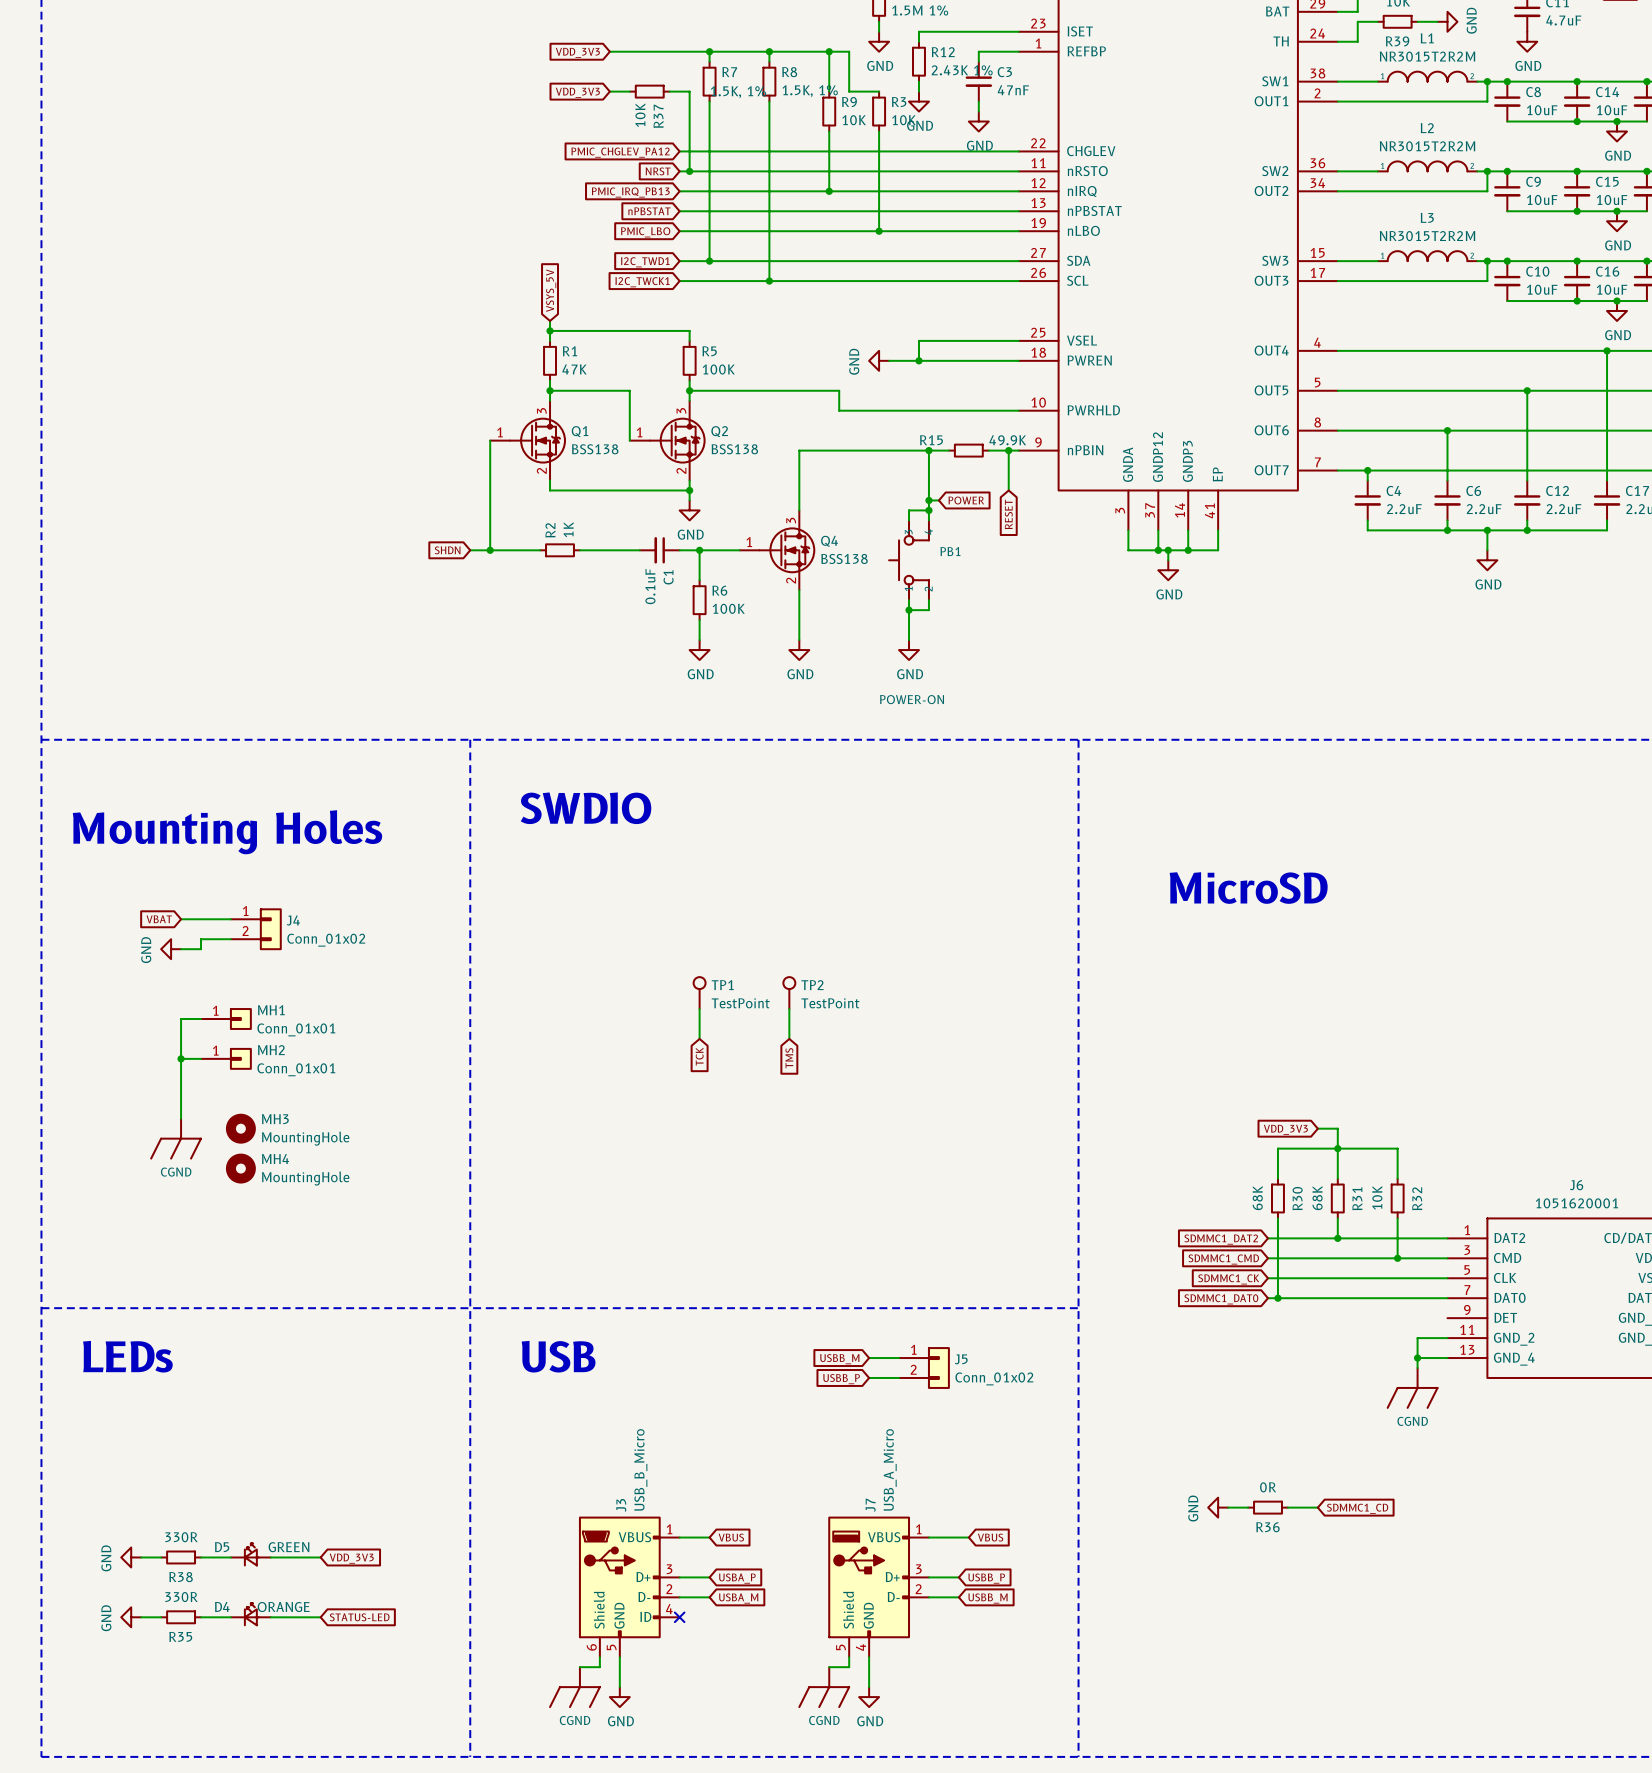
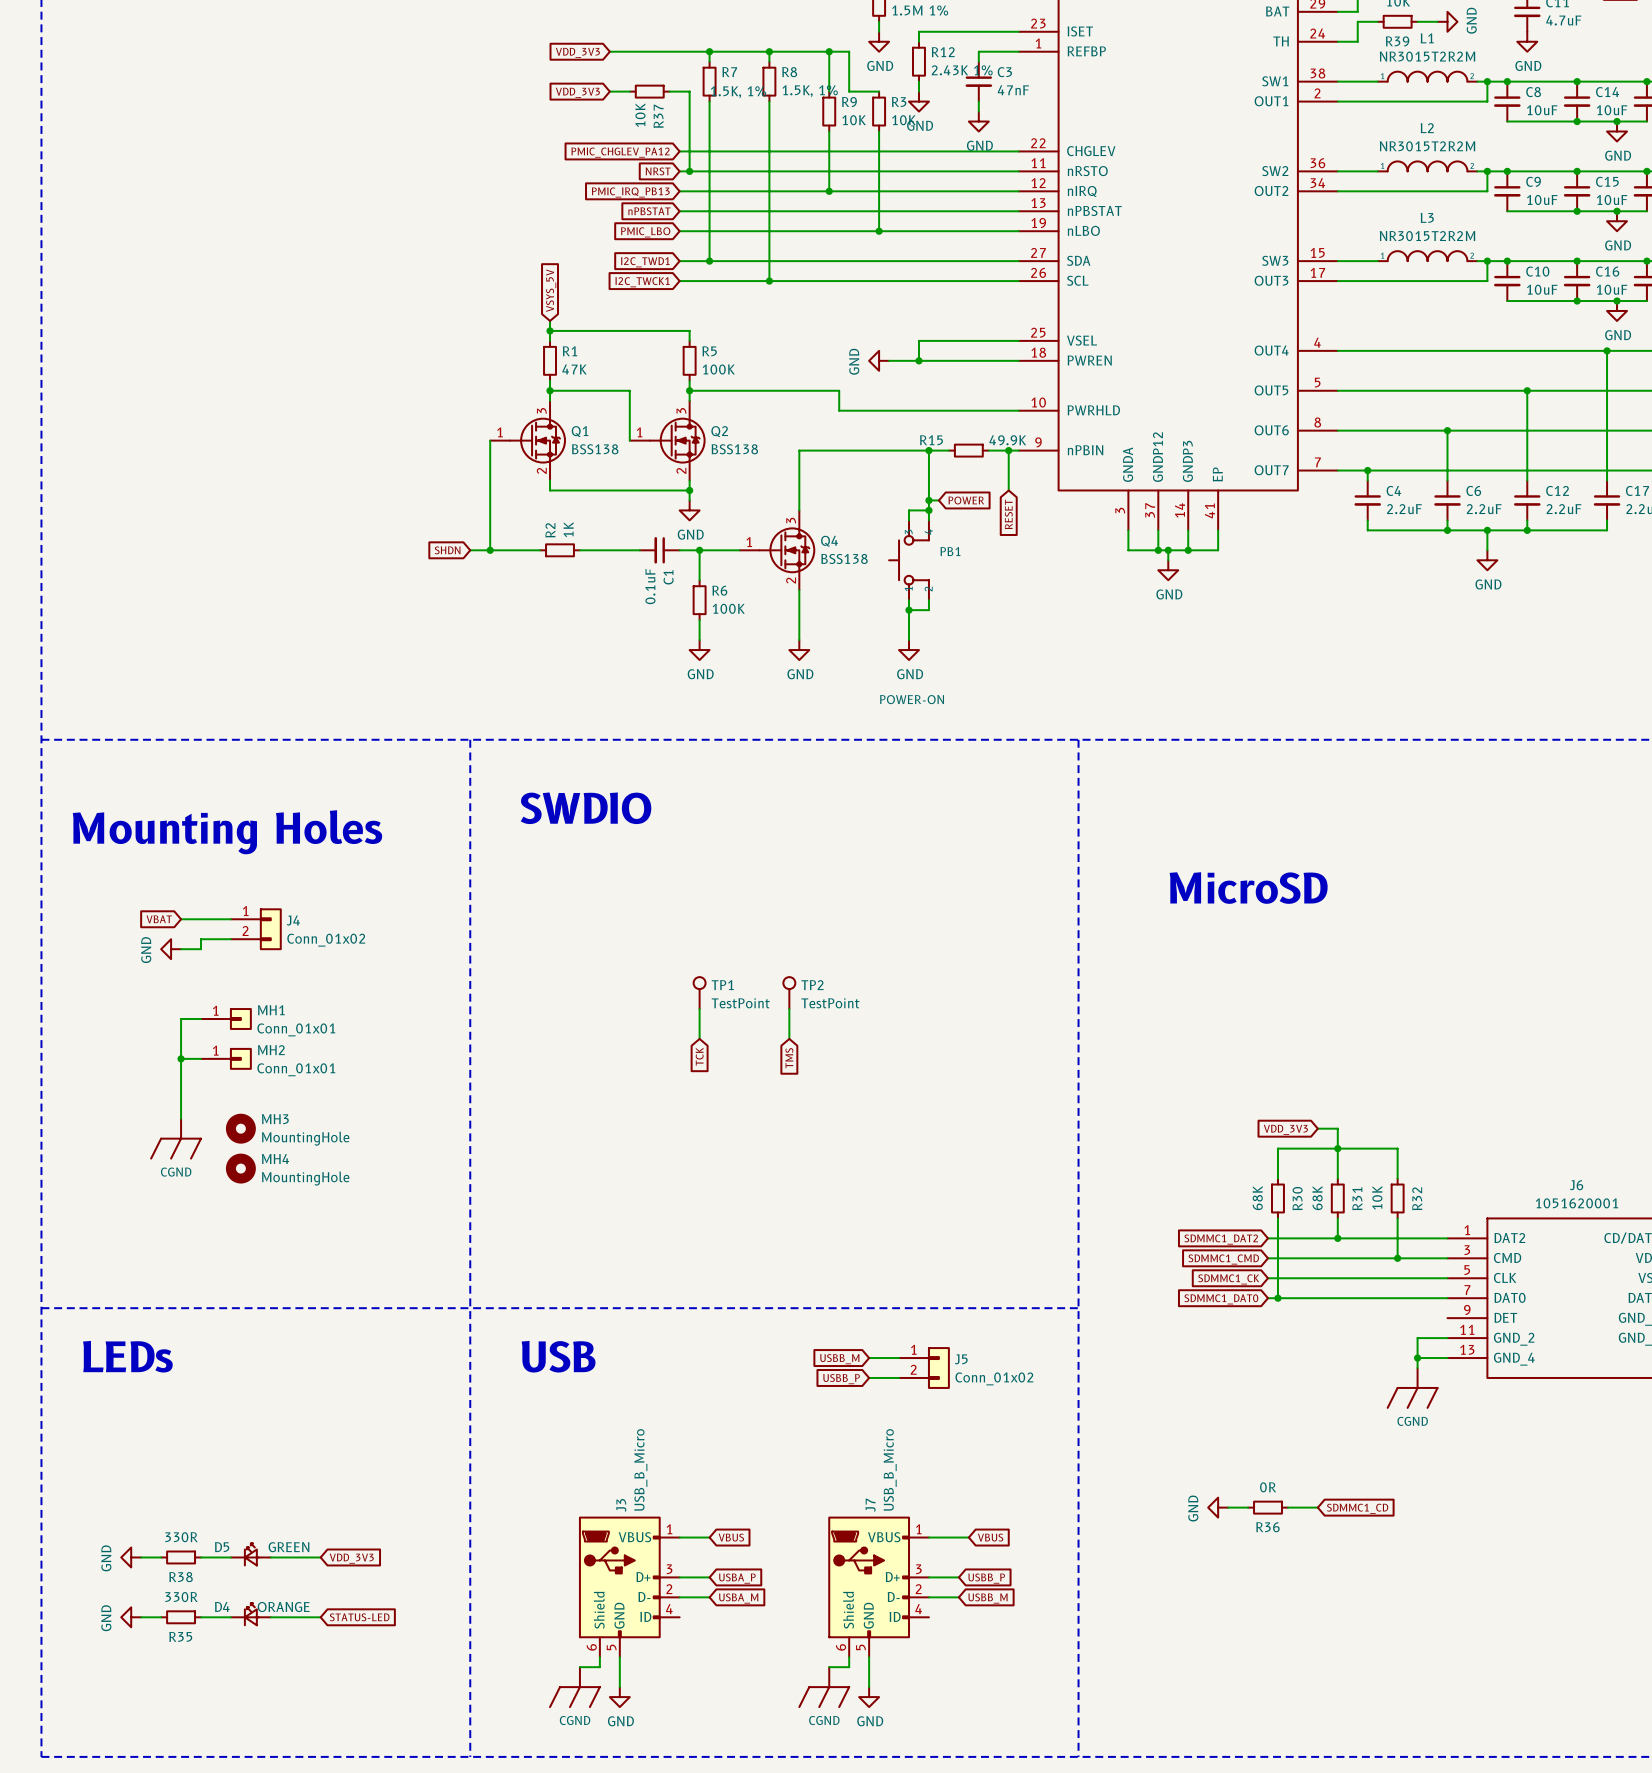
J7 value: USB_A_Micro (890, 1469) -> USB_B_Micro (890, 1469)
J7 symbol: [828, 1516, 929, 1658] -> [828, 1516, 929, 1658]
no-connect mark: (679, 1617) -> none

